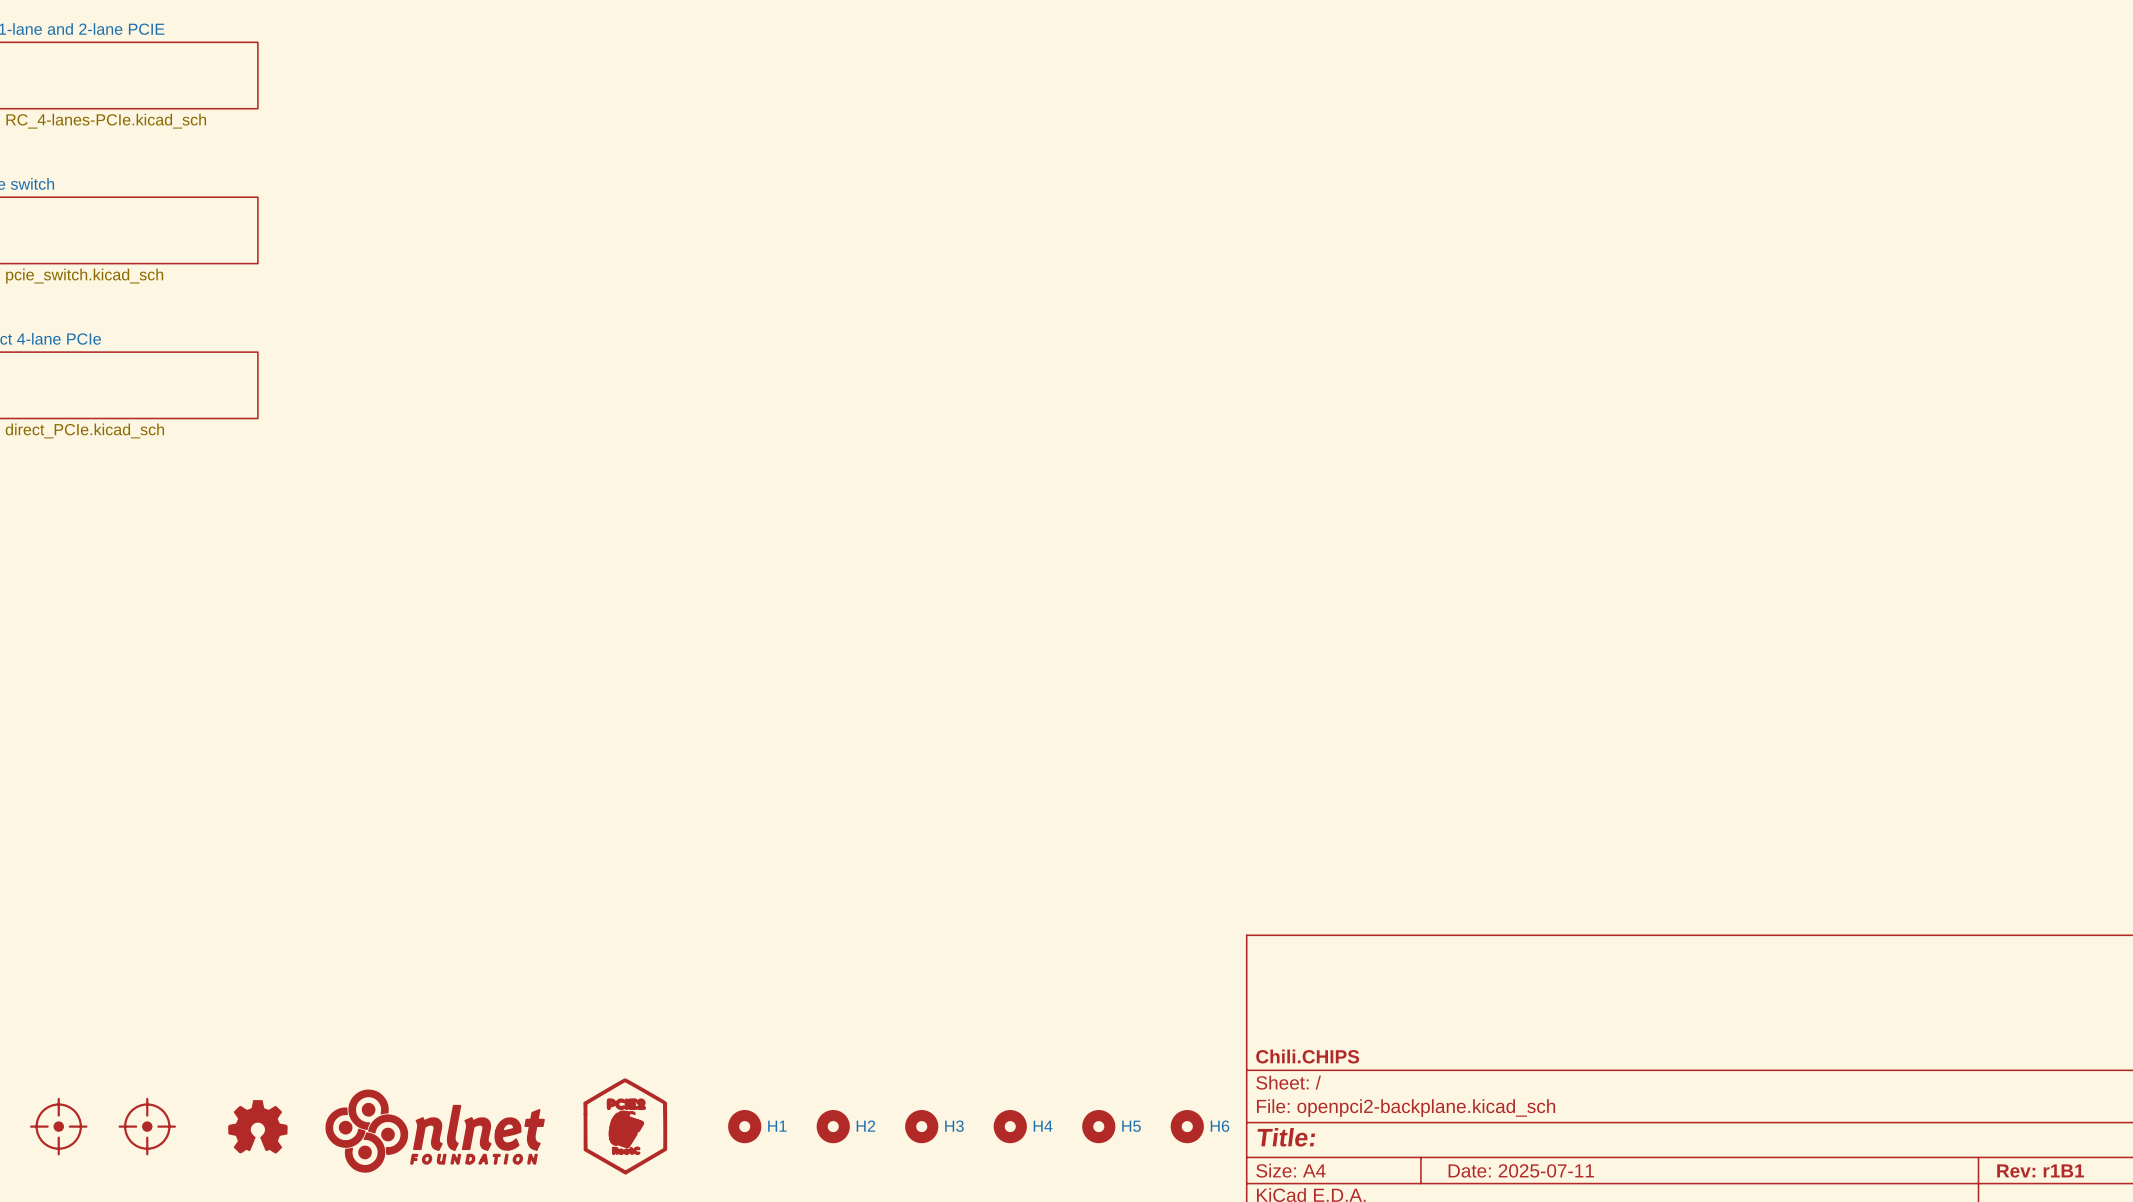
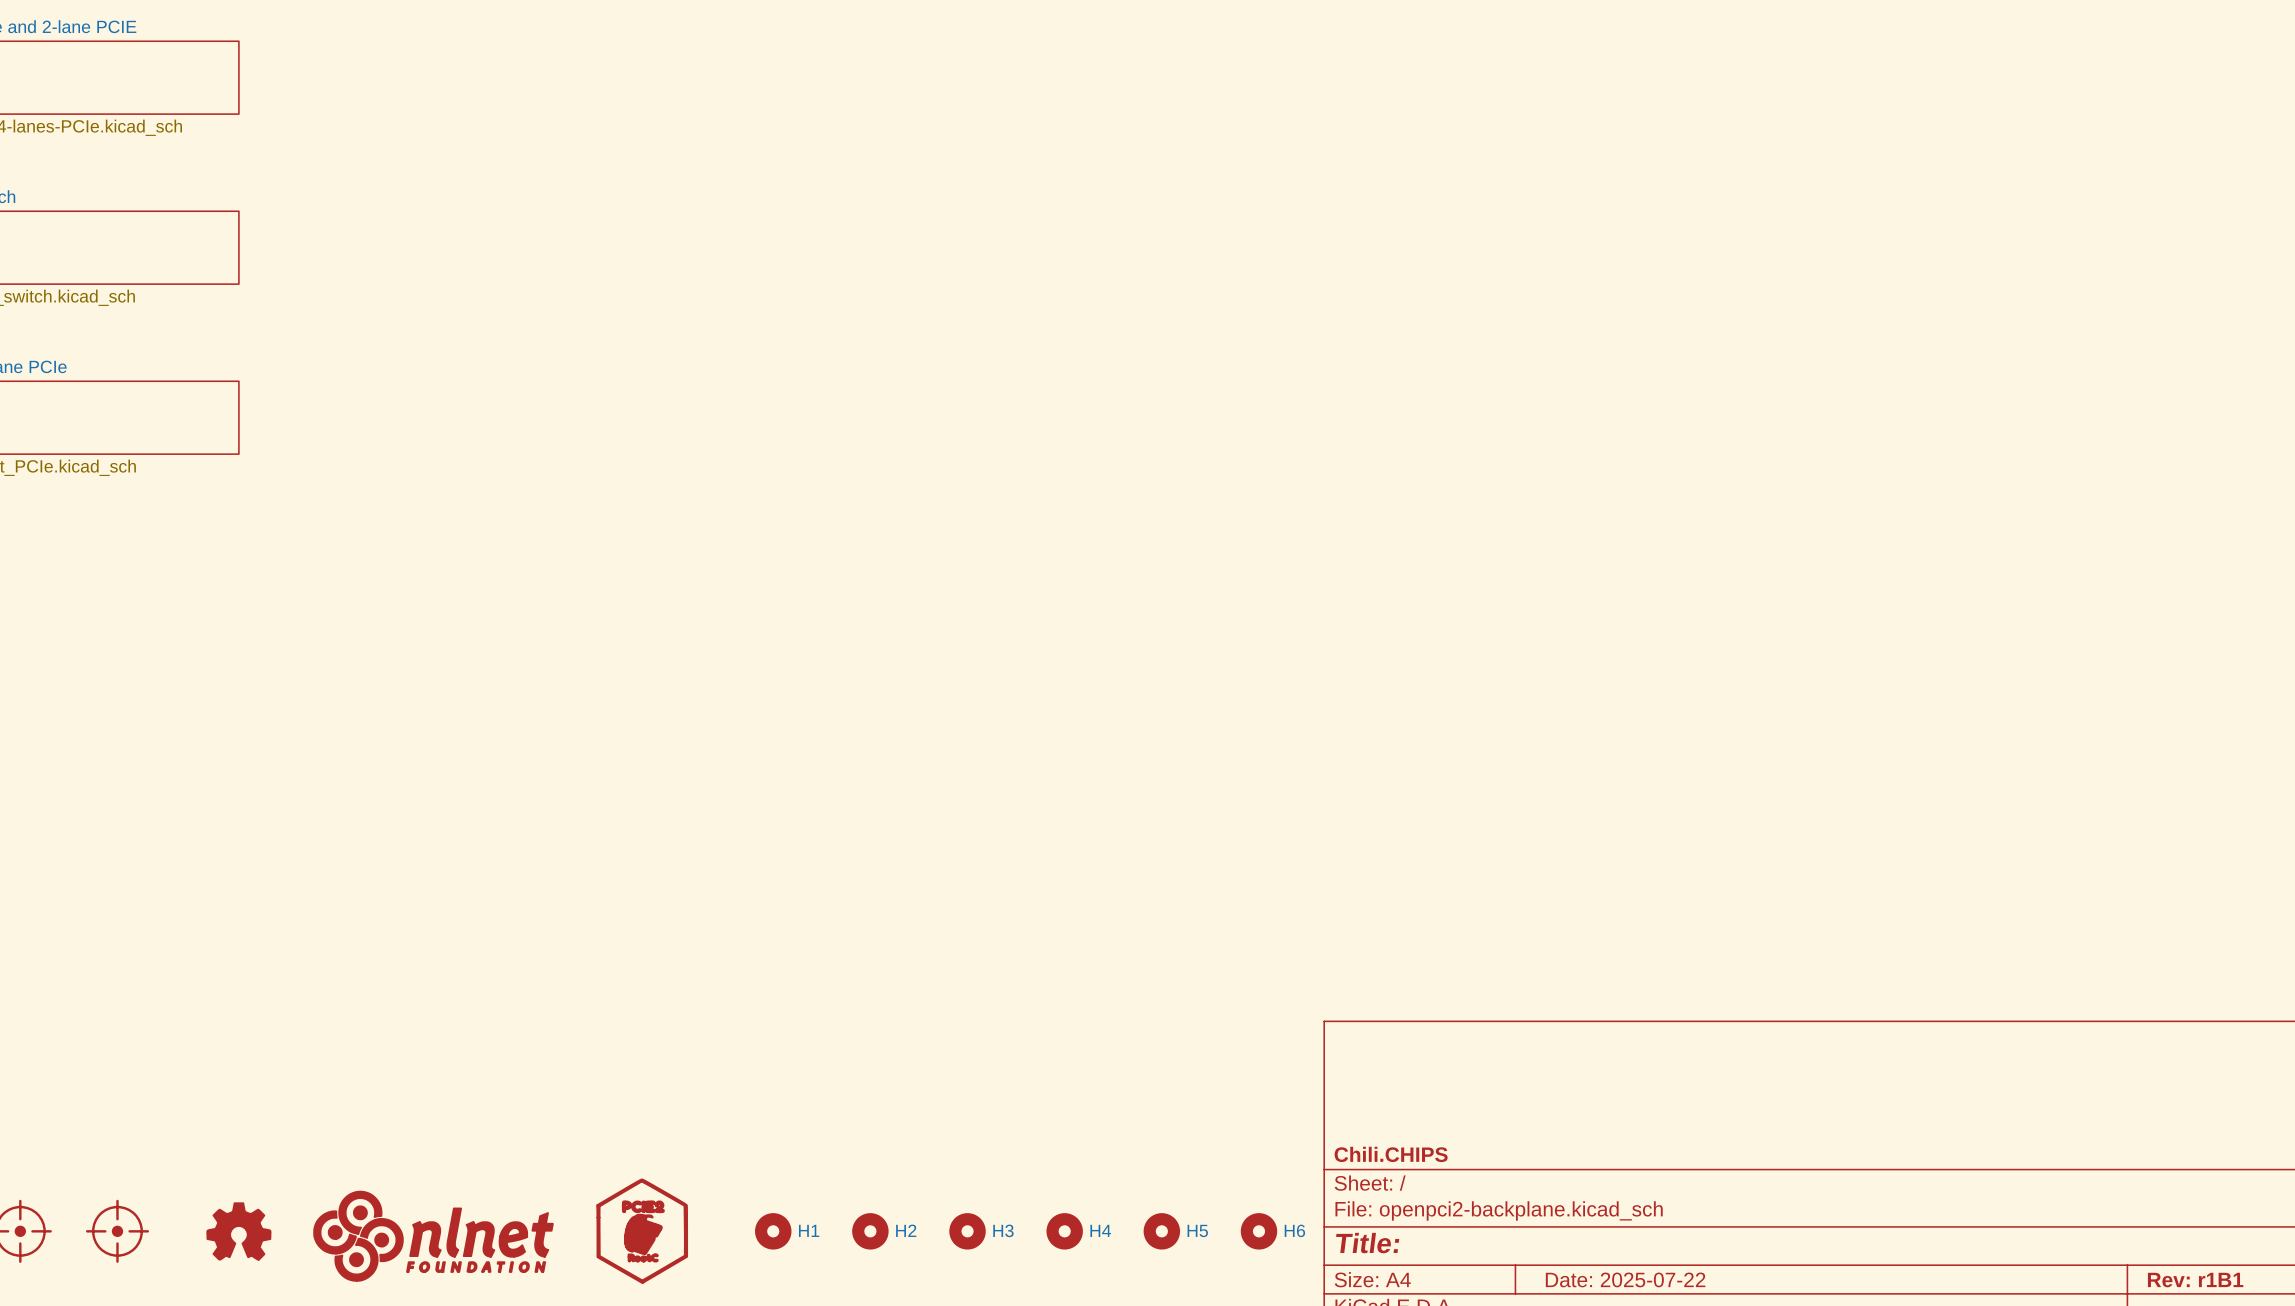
title block: Date: 2025-07-11 (1521, 1170) -> Date: 2025-07-22 (1625, 1279)

